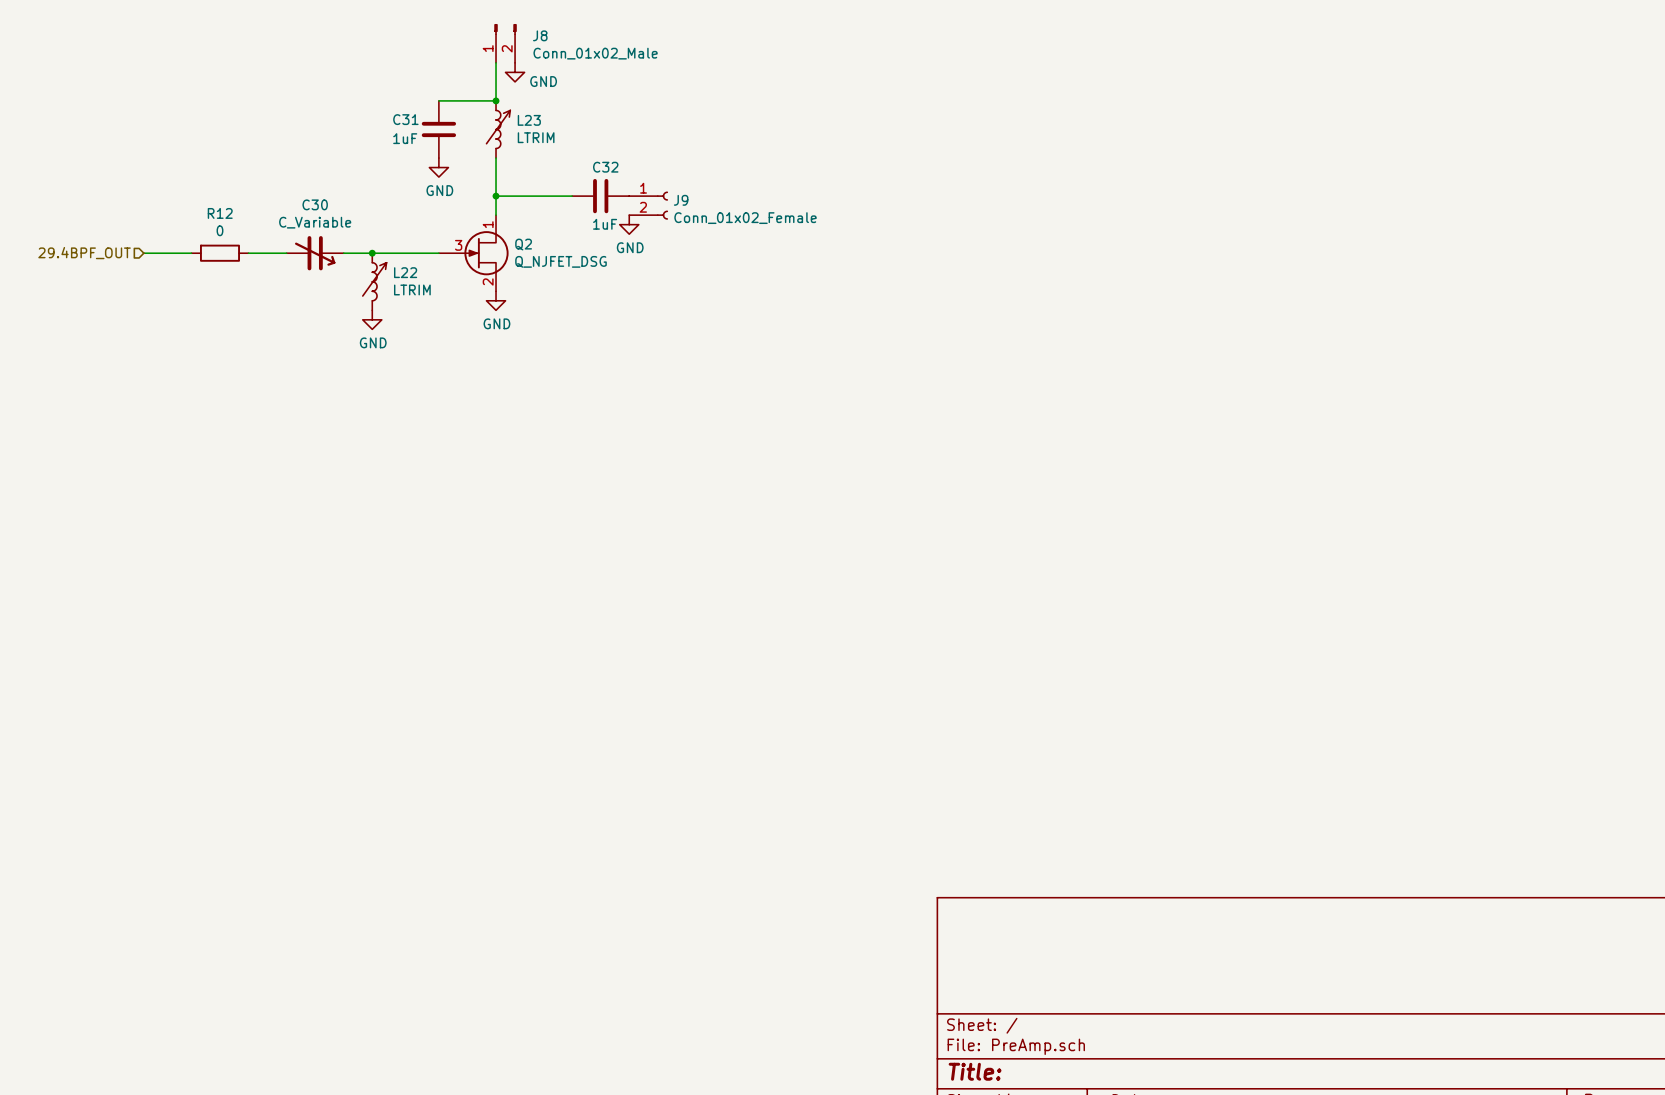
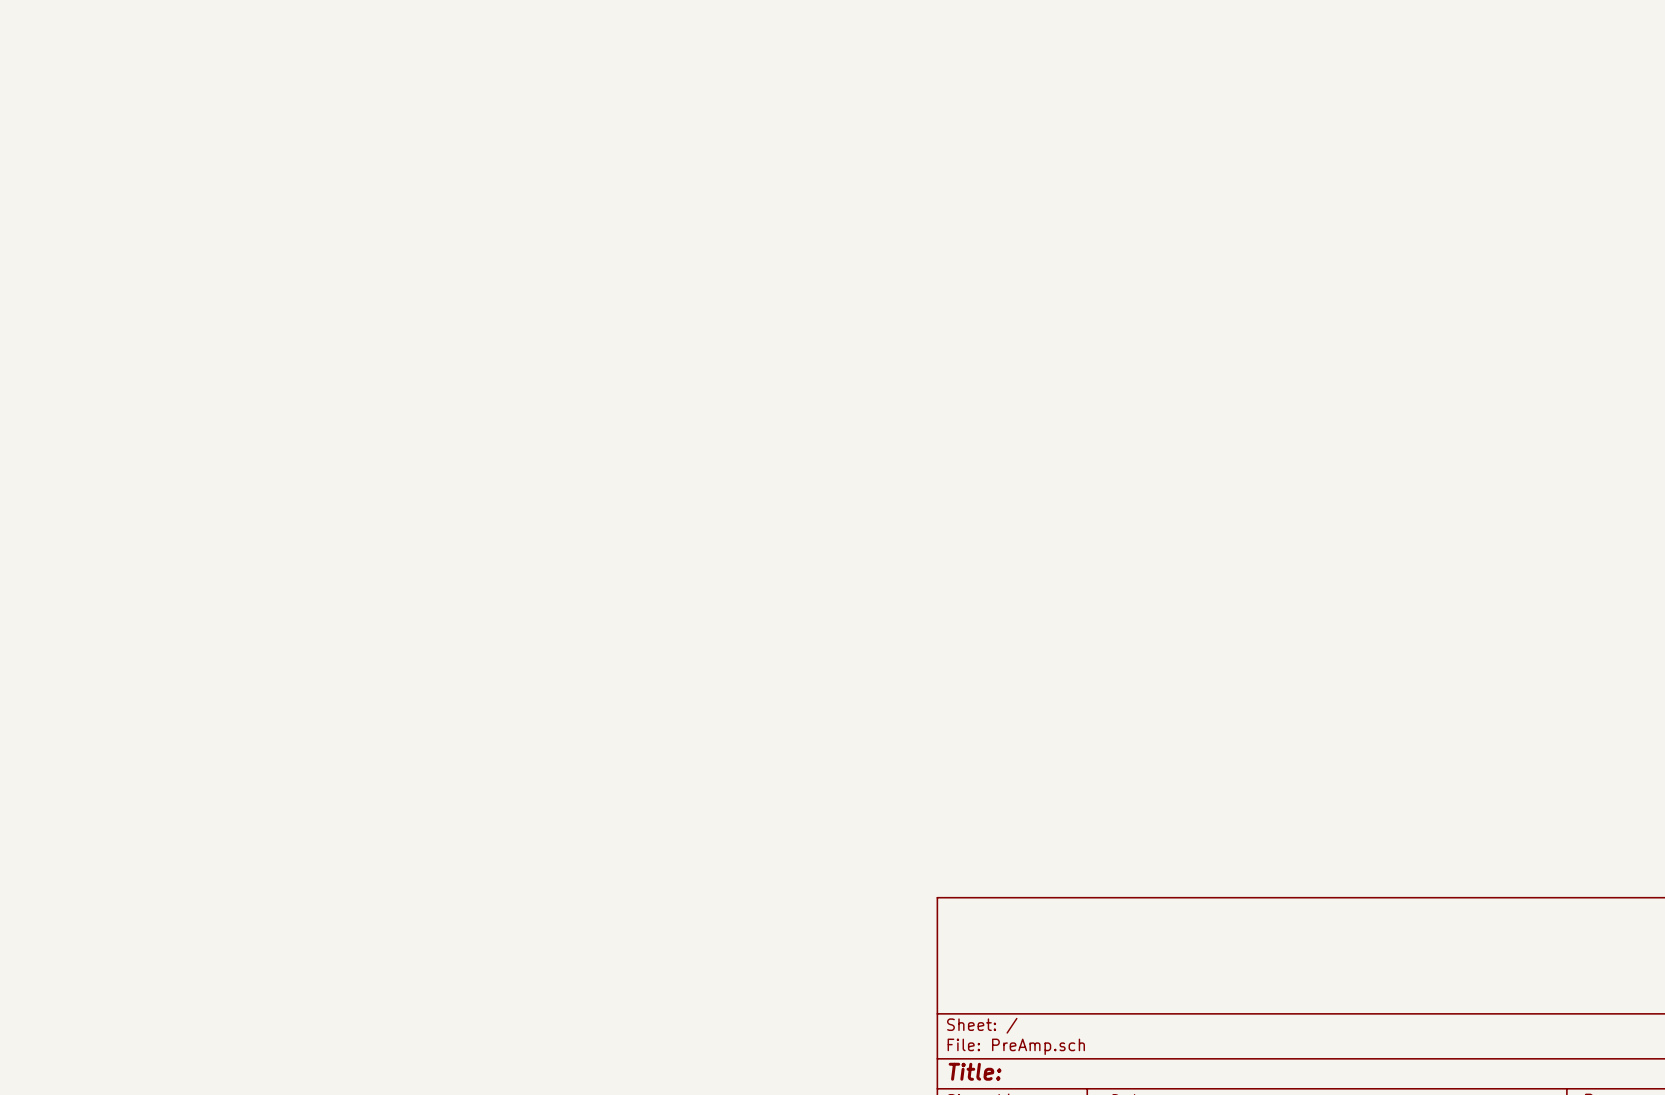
J8: Conn_01x02_Male (505, 43) -> none
wire: (496, 62) (496, 100) (438, 100) -> none
power symbol: GND (515, 72) -> none
junction: (496, 100) -> none
C31: 1uF (438, 129) -> none
L23: LTRIM (498, 129) -> none
wire: (496, 158) (496, 215) -> none
power symbol: GND (438, 167) -> none
wire: (496, 196) (572, 196) -> none
junction: (496, 196) -> none
C32: 1uF (600, 196) -> none
J9: Conn_01x02_Female (648, 205) -> none
power symbol: GND (629, 224) -> none
hierarchical label: 29.4BPF_OUT (84, 253) -> none
wire: (143, 253) (191, 253) -> none
R12: 0 (219, 253) -> none
wire: (248, 253) (286, 253) -> none
C30: C_Variable (315, 253) -> none
wire: (343, 253) (438, 253) -> none
junction: (372, 253) -> none
Q2: Q_NJFET_DSG (473, 253) -> none
L22: LTRIM (374, 281) -> none
power symbol: GND (496, 300) -> none
power symbol: GND (372, 319) -> none

